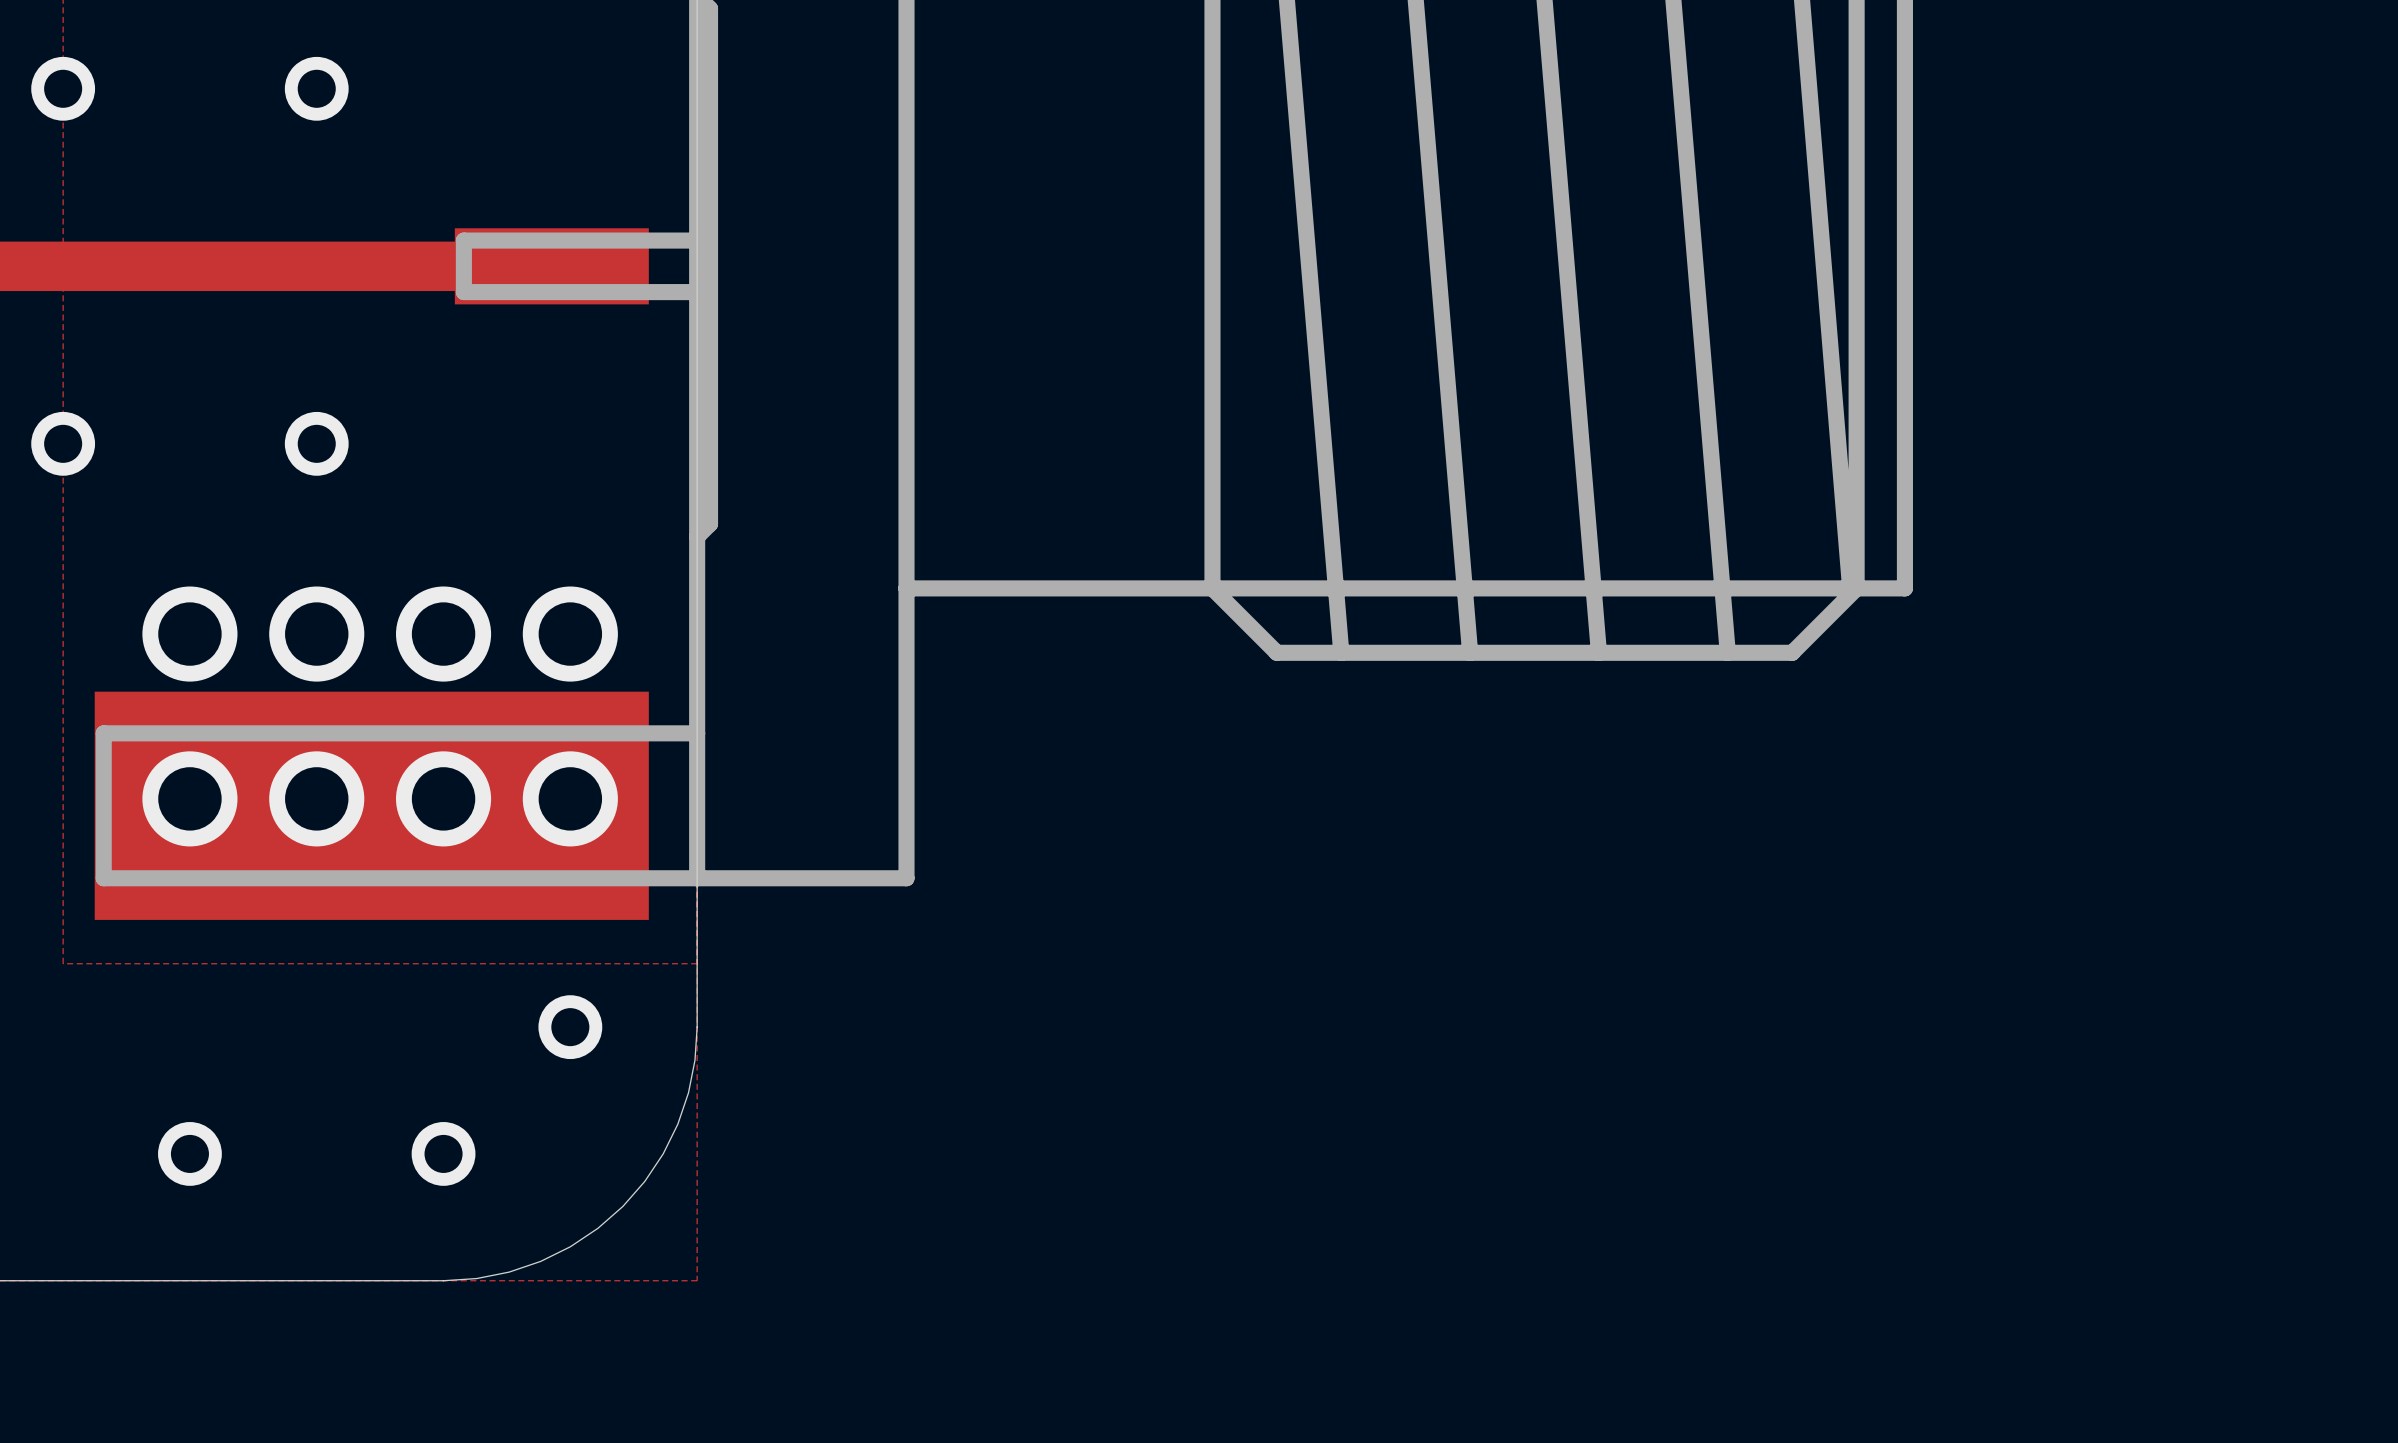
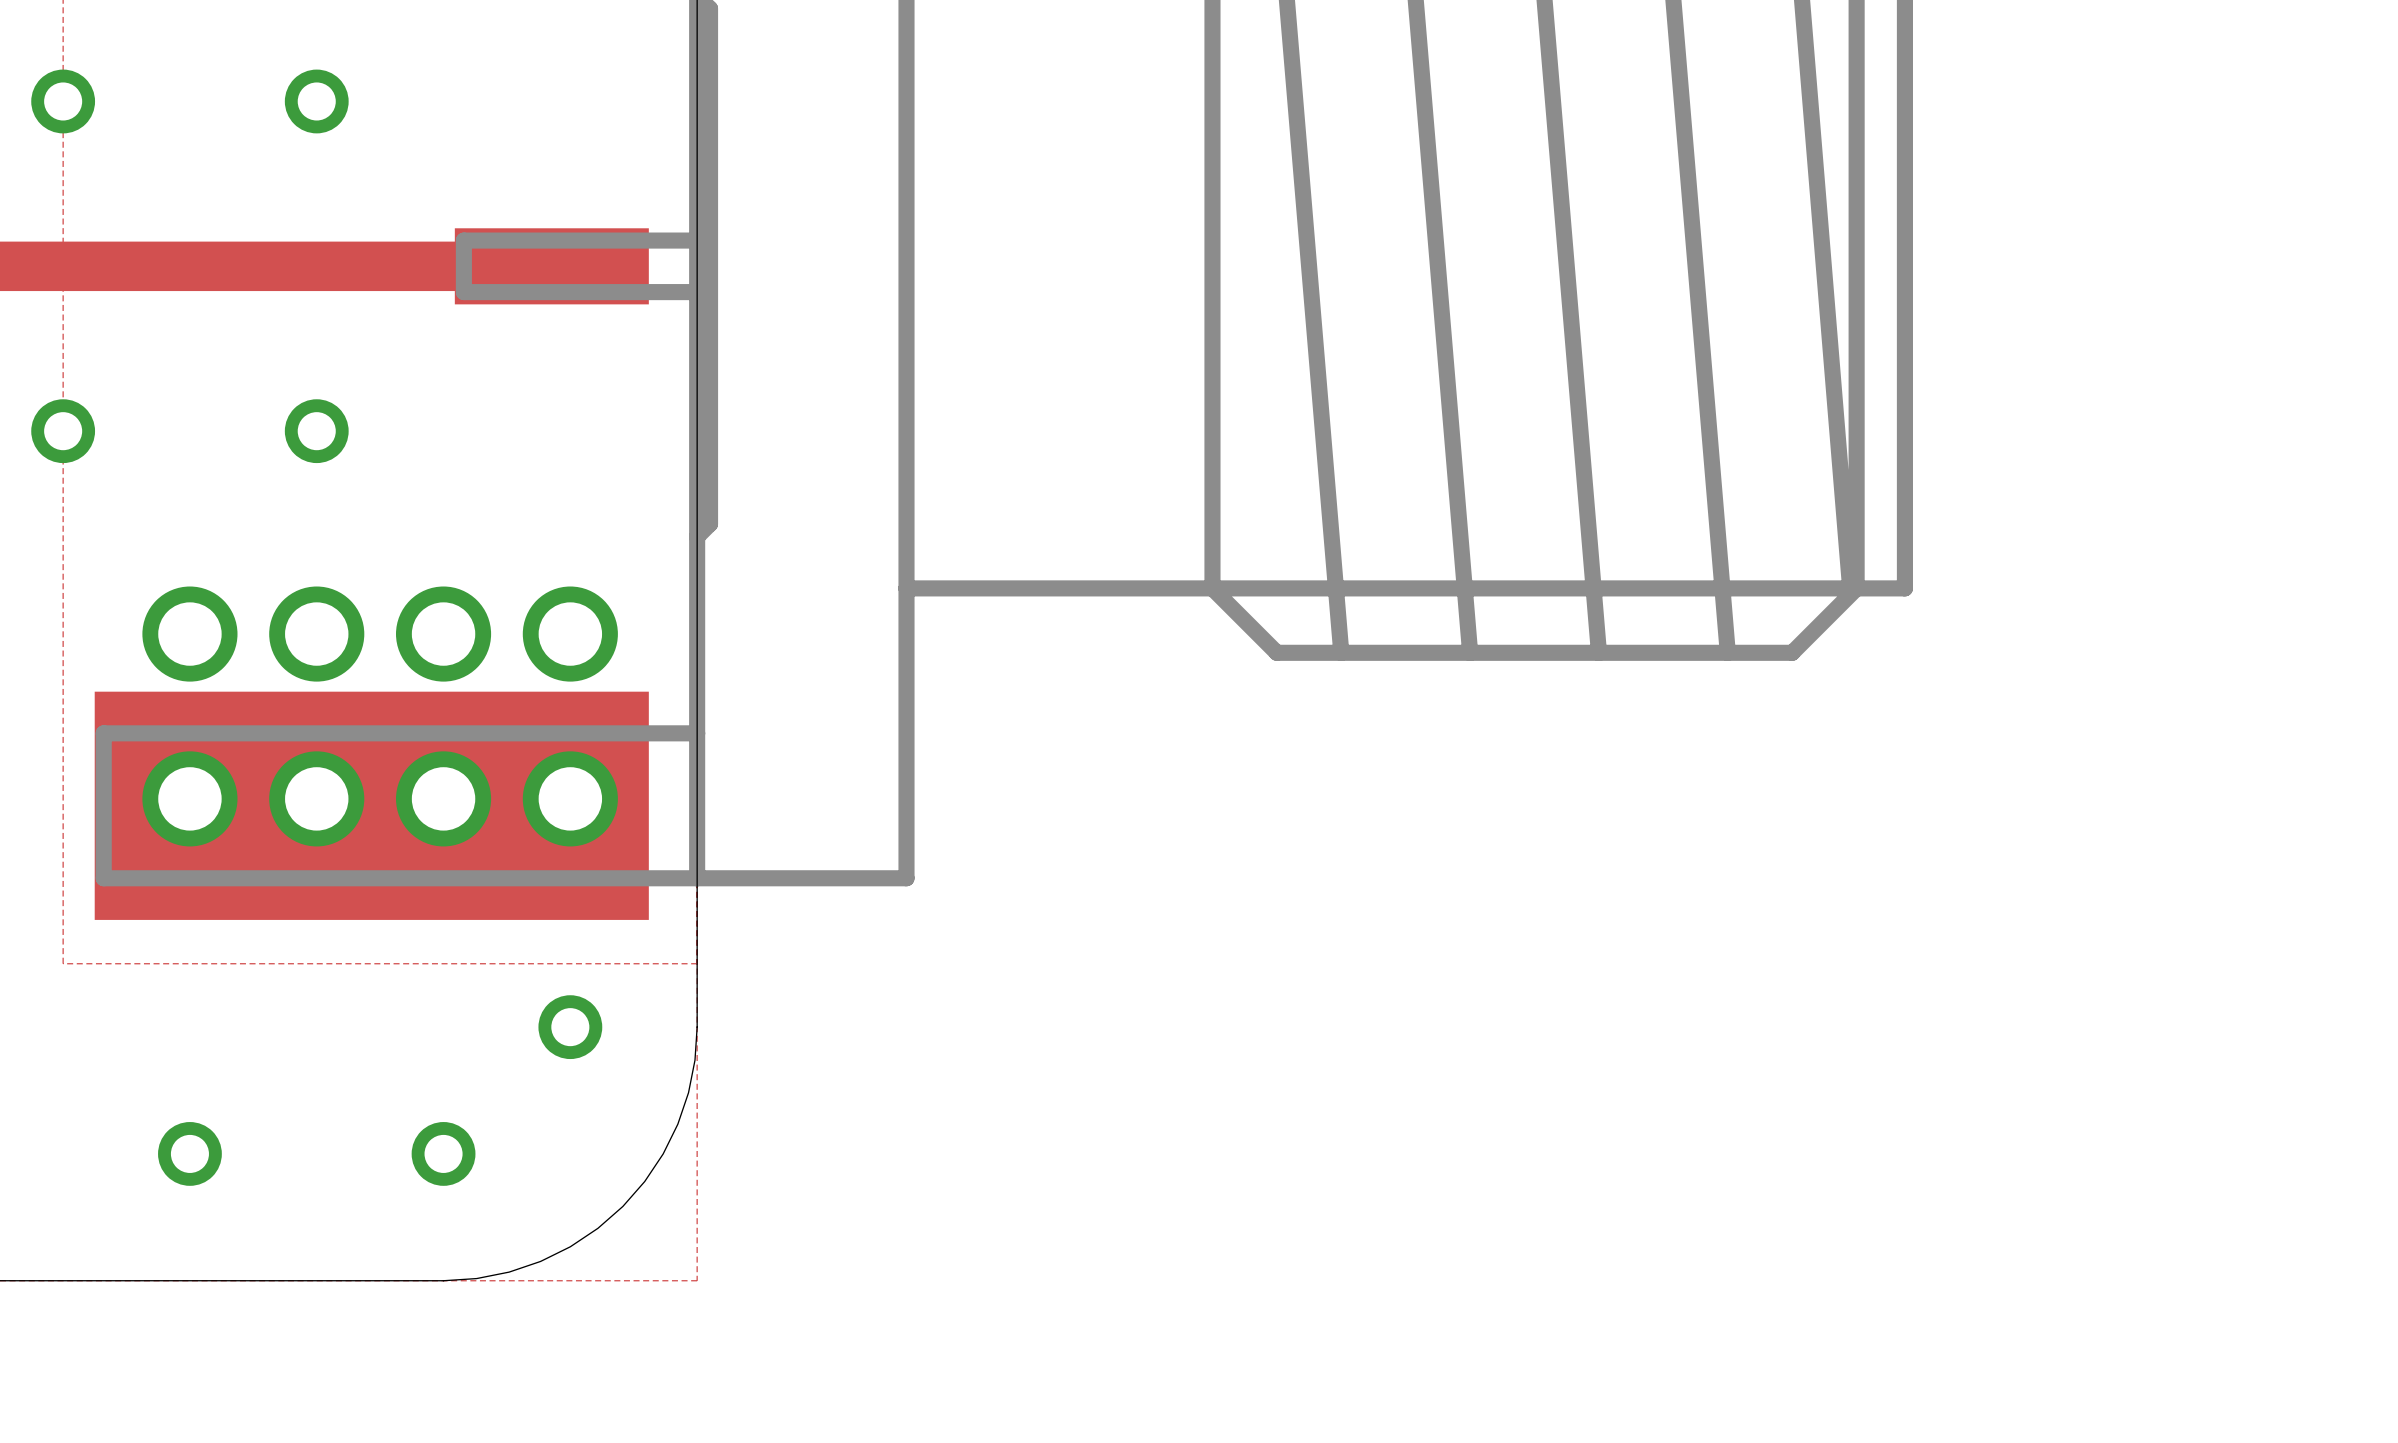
via position: (63, 88) -> (63, 101)
via position: (316, 88) -> (316, 101)
via position: (63, 443) -> (63, 431)
via position: (316, 443) -> (316, 431)

